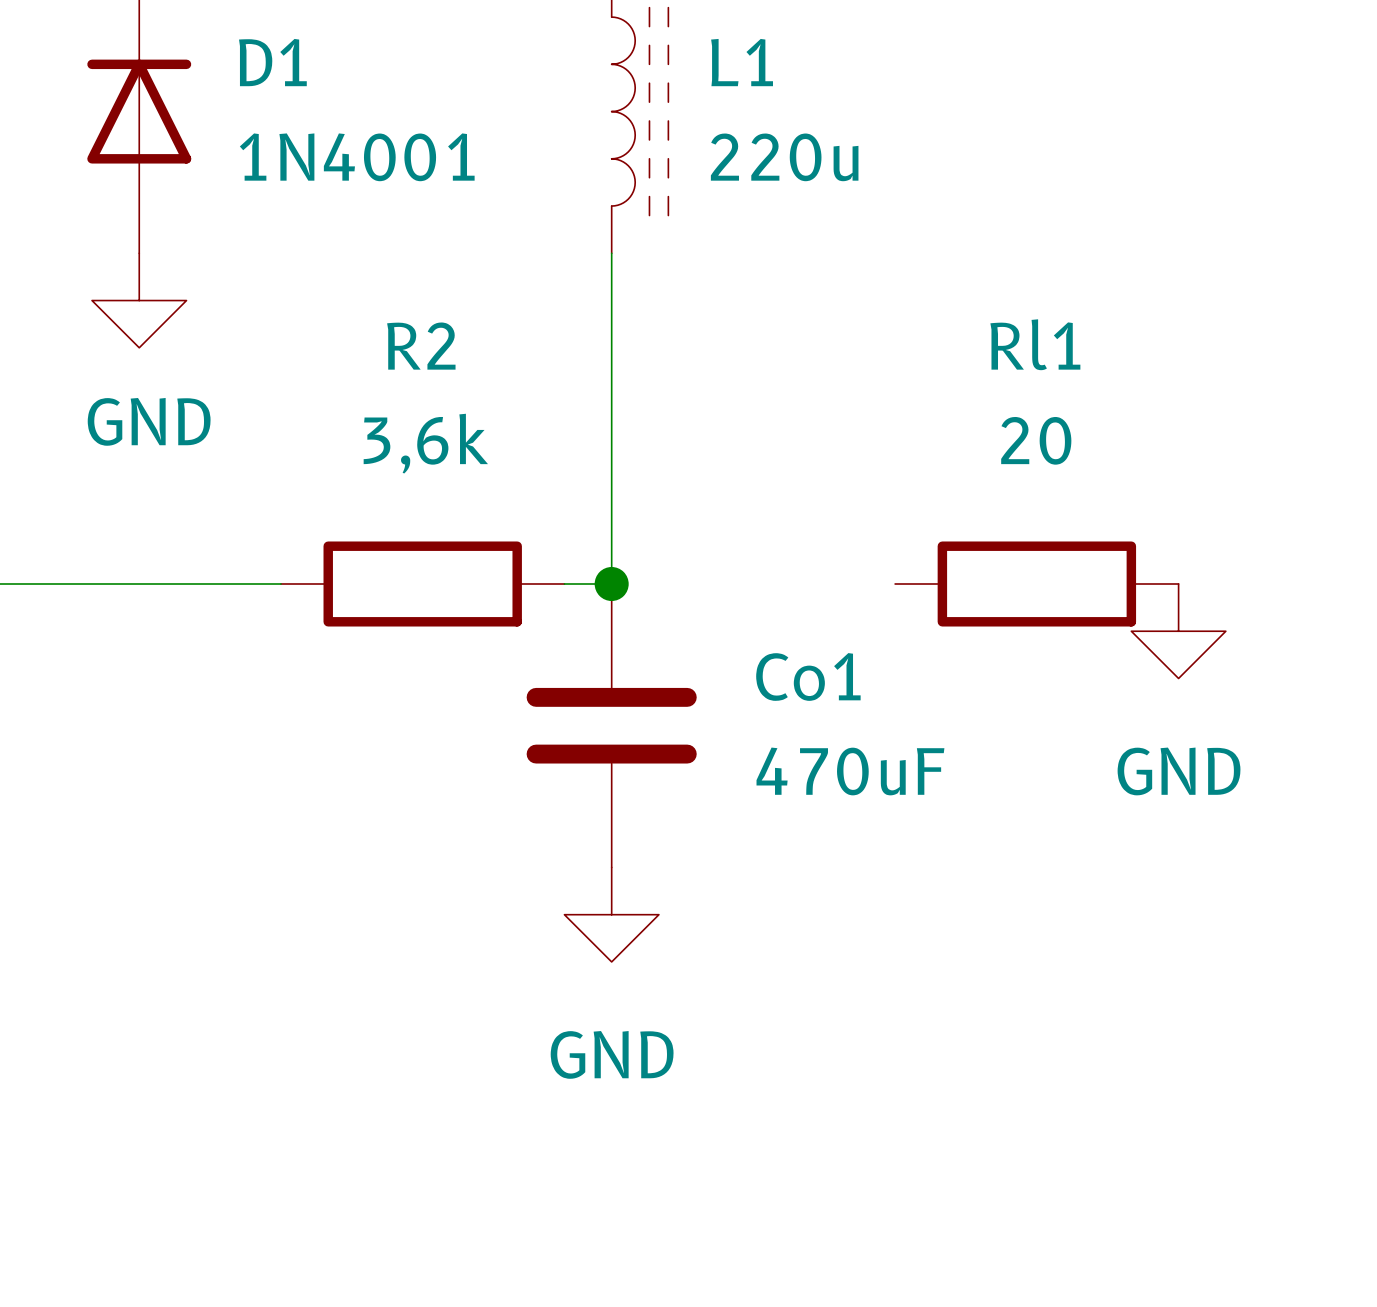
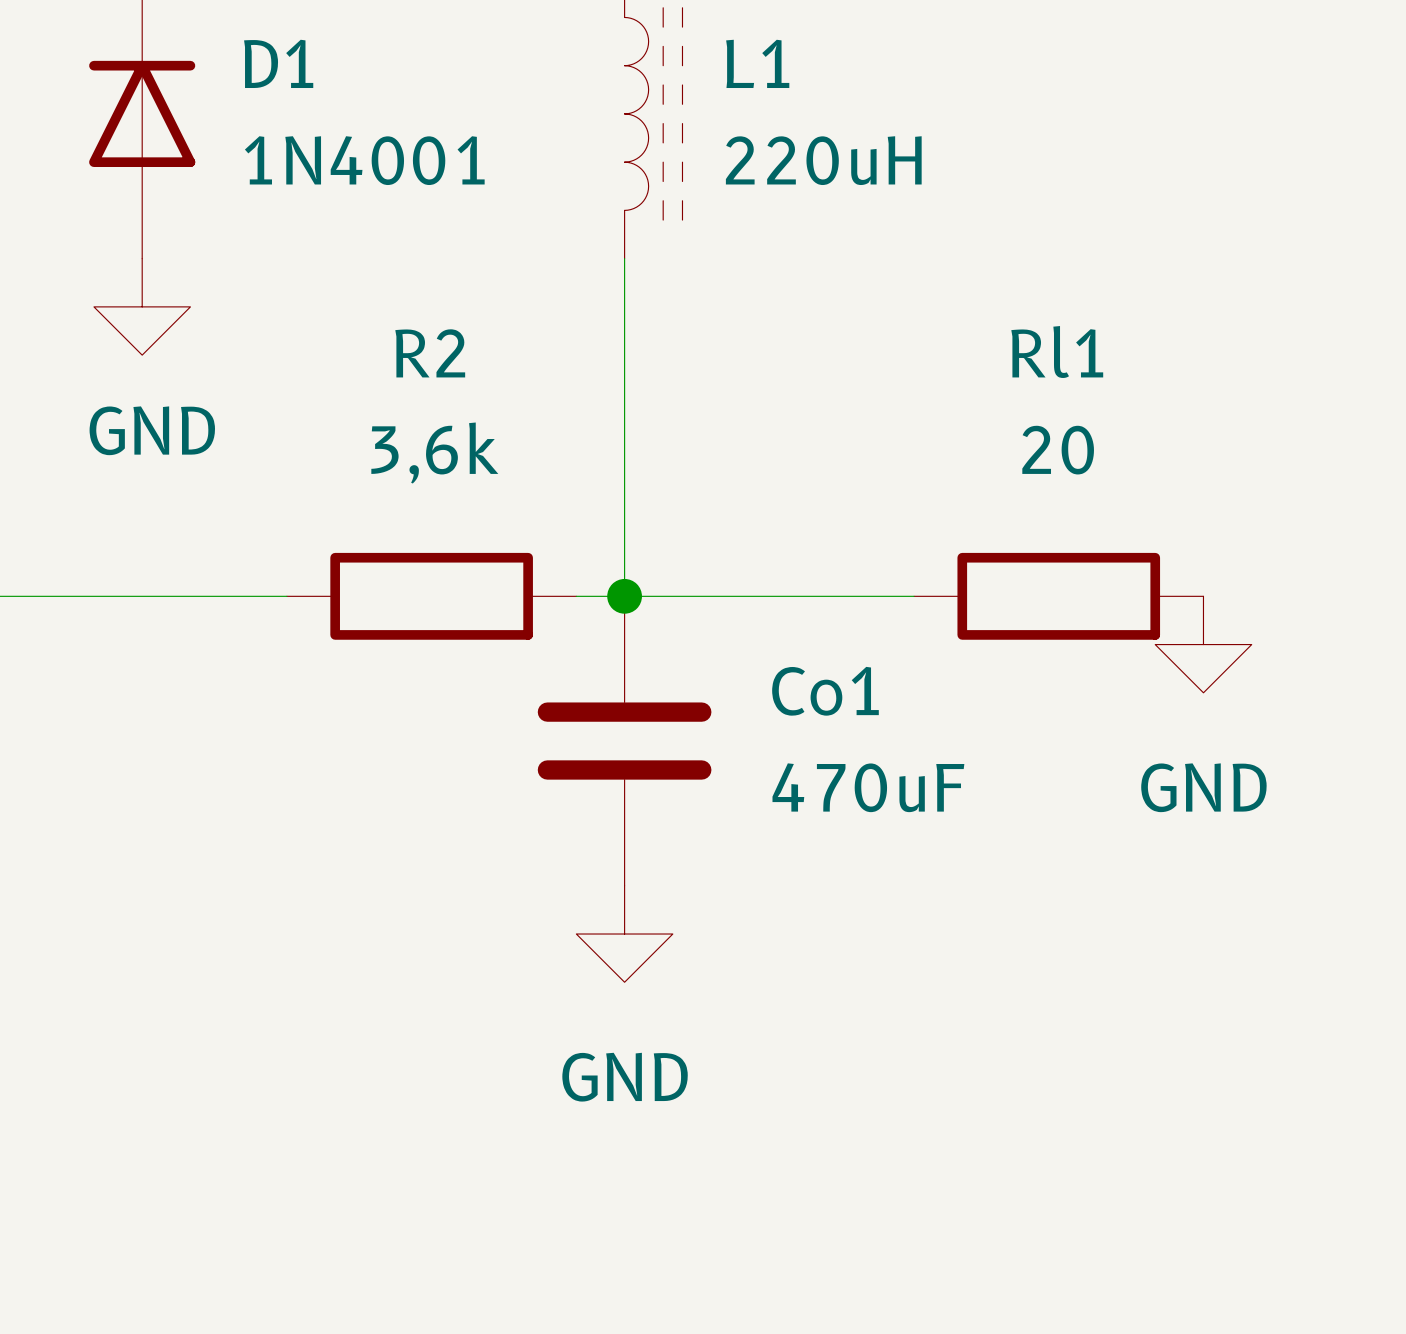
L1 value: 220u (784, 157) -> 220uH (823, 160)
wire: none -> (624, 596) (914, 596)

